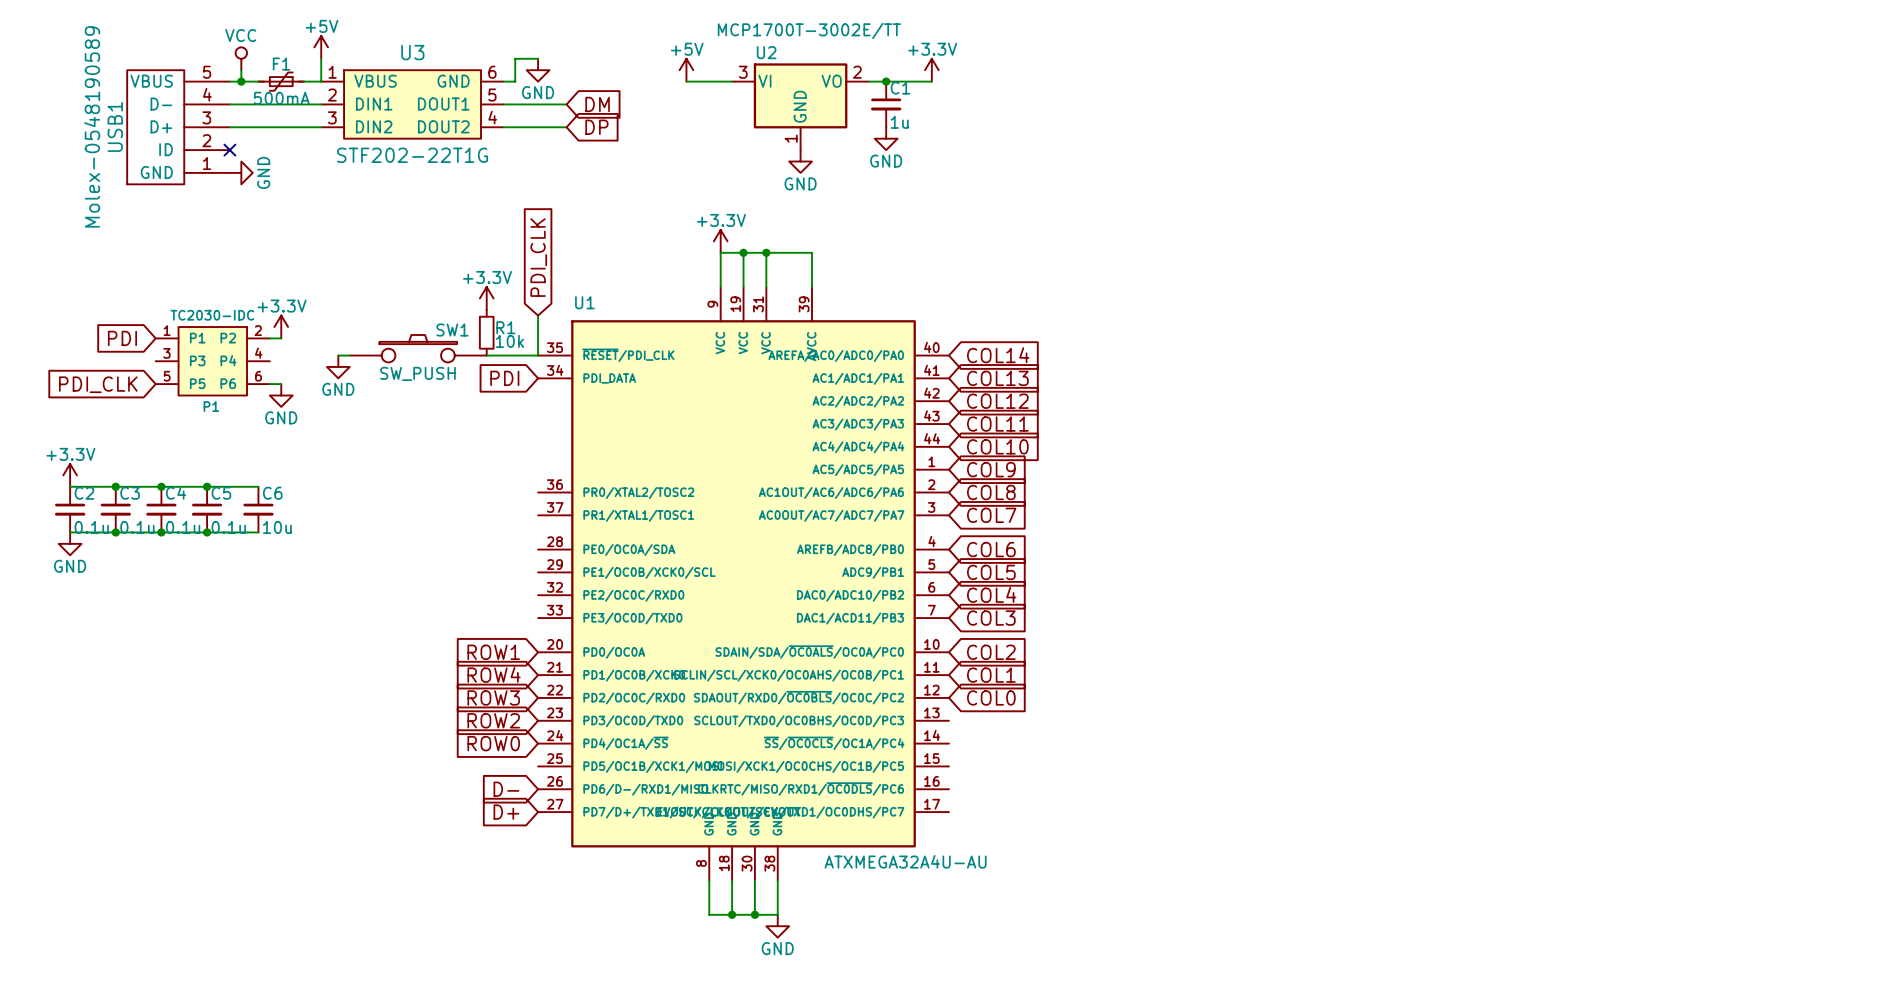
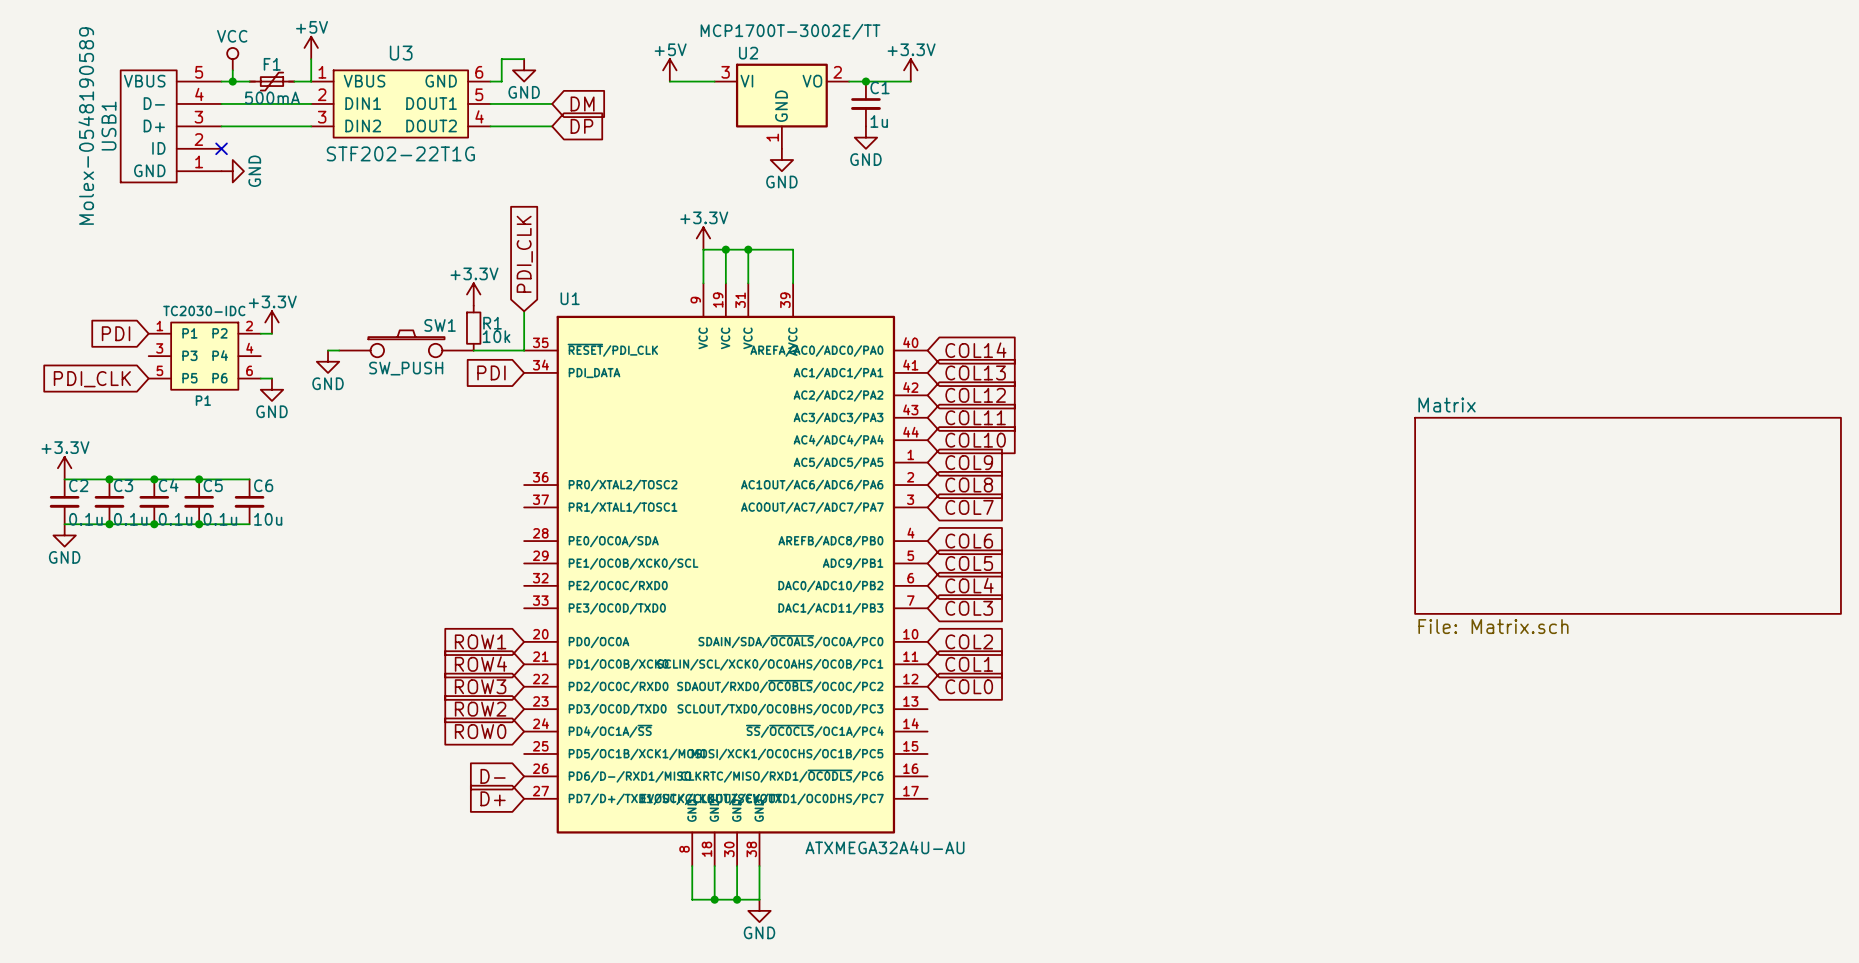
sheet Matrix: none -> File: Matrix.sch (1628, 515)

